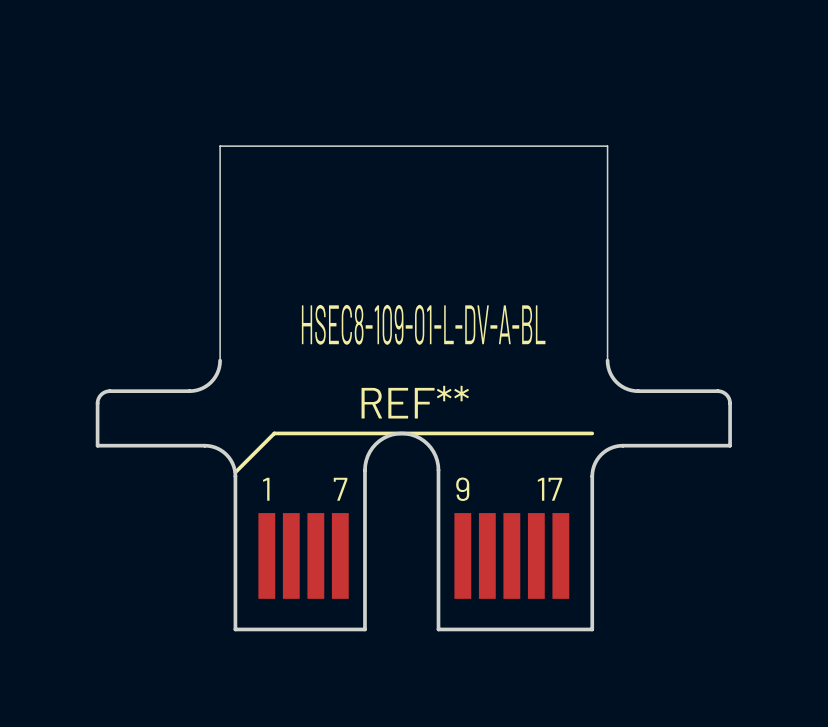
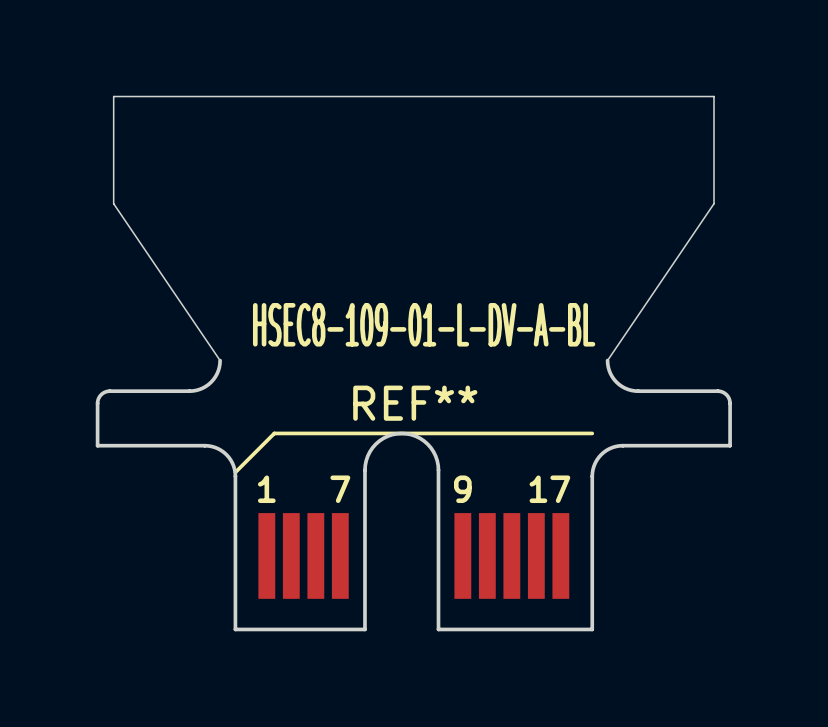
board edge: (220, 360) (220, 146) (607, 146) (607, 360) -> (220, 360) (113, 203) (113, 96) (714, 96) (714, 203) (607, 360)

